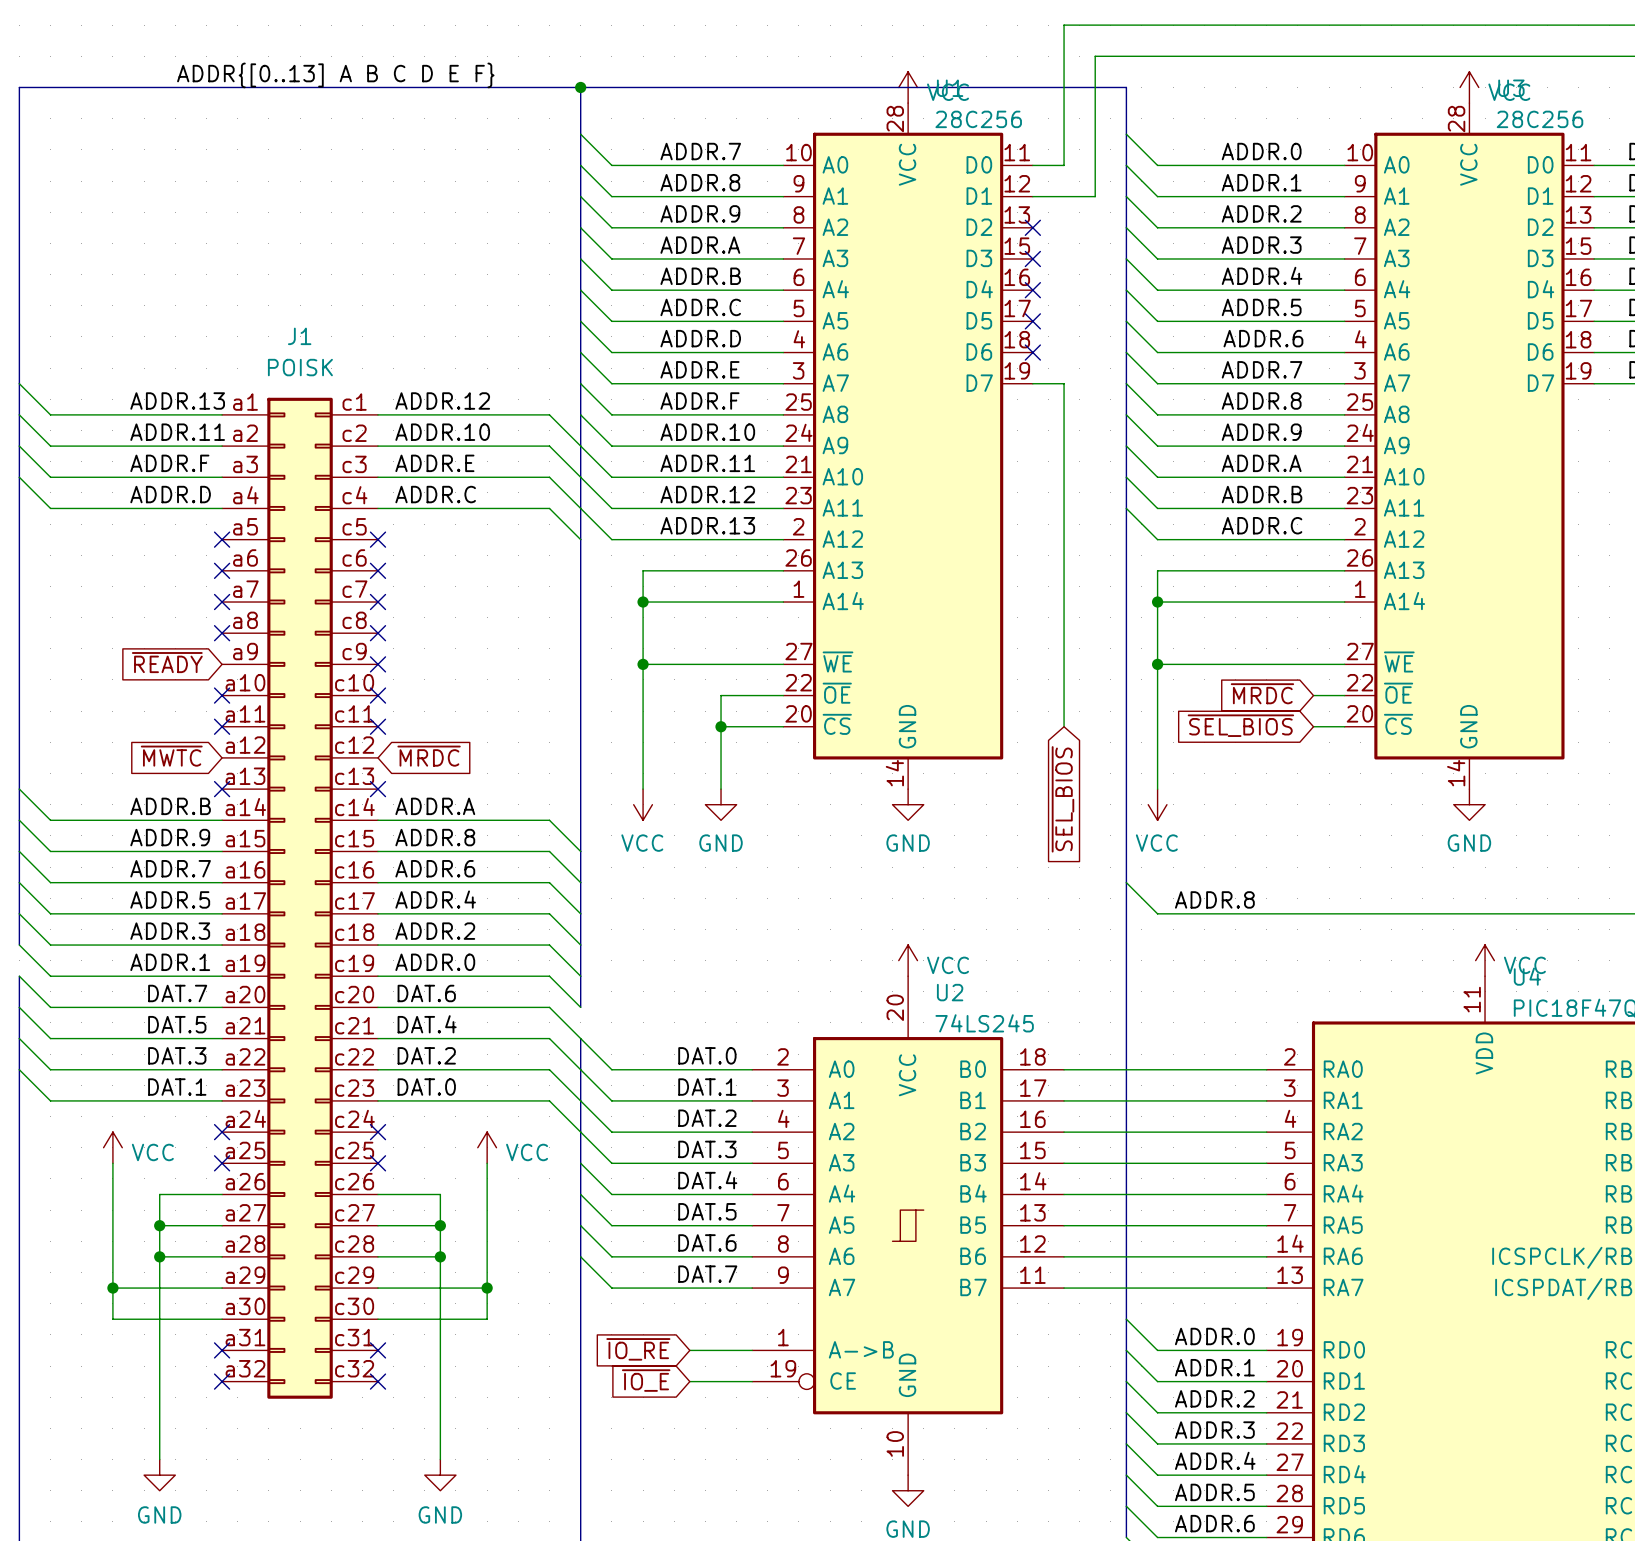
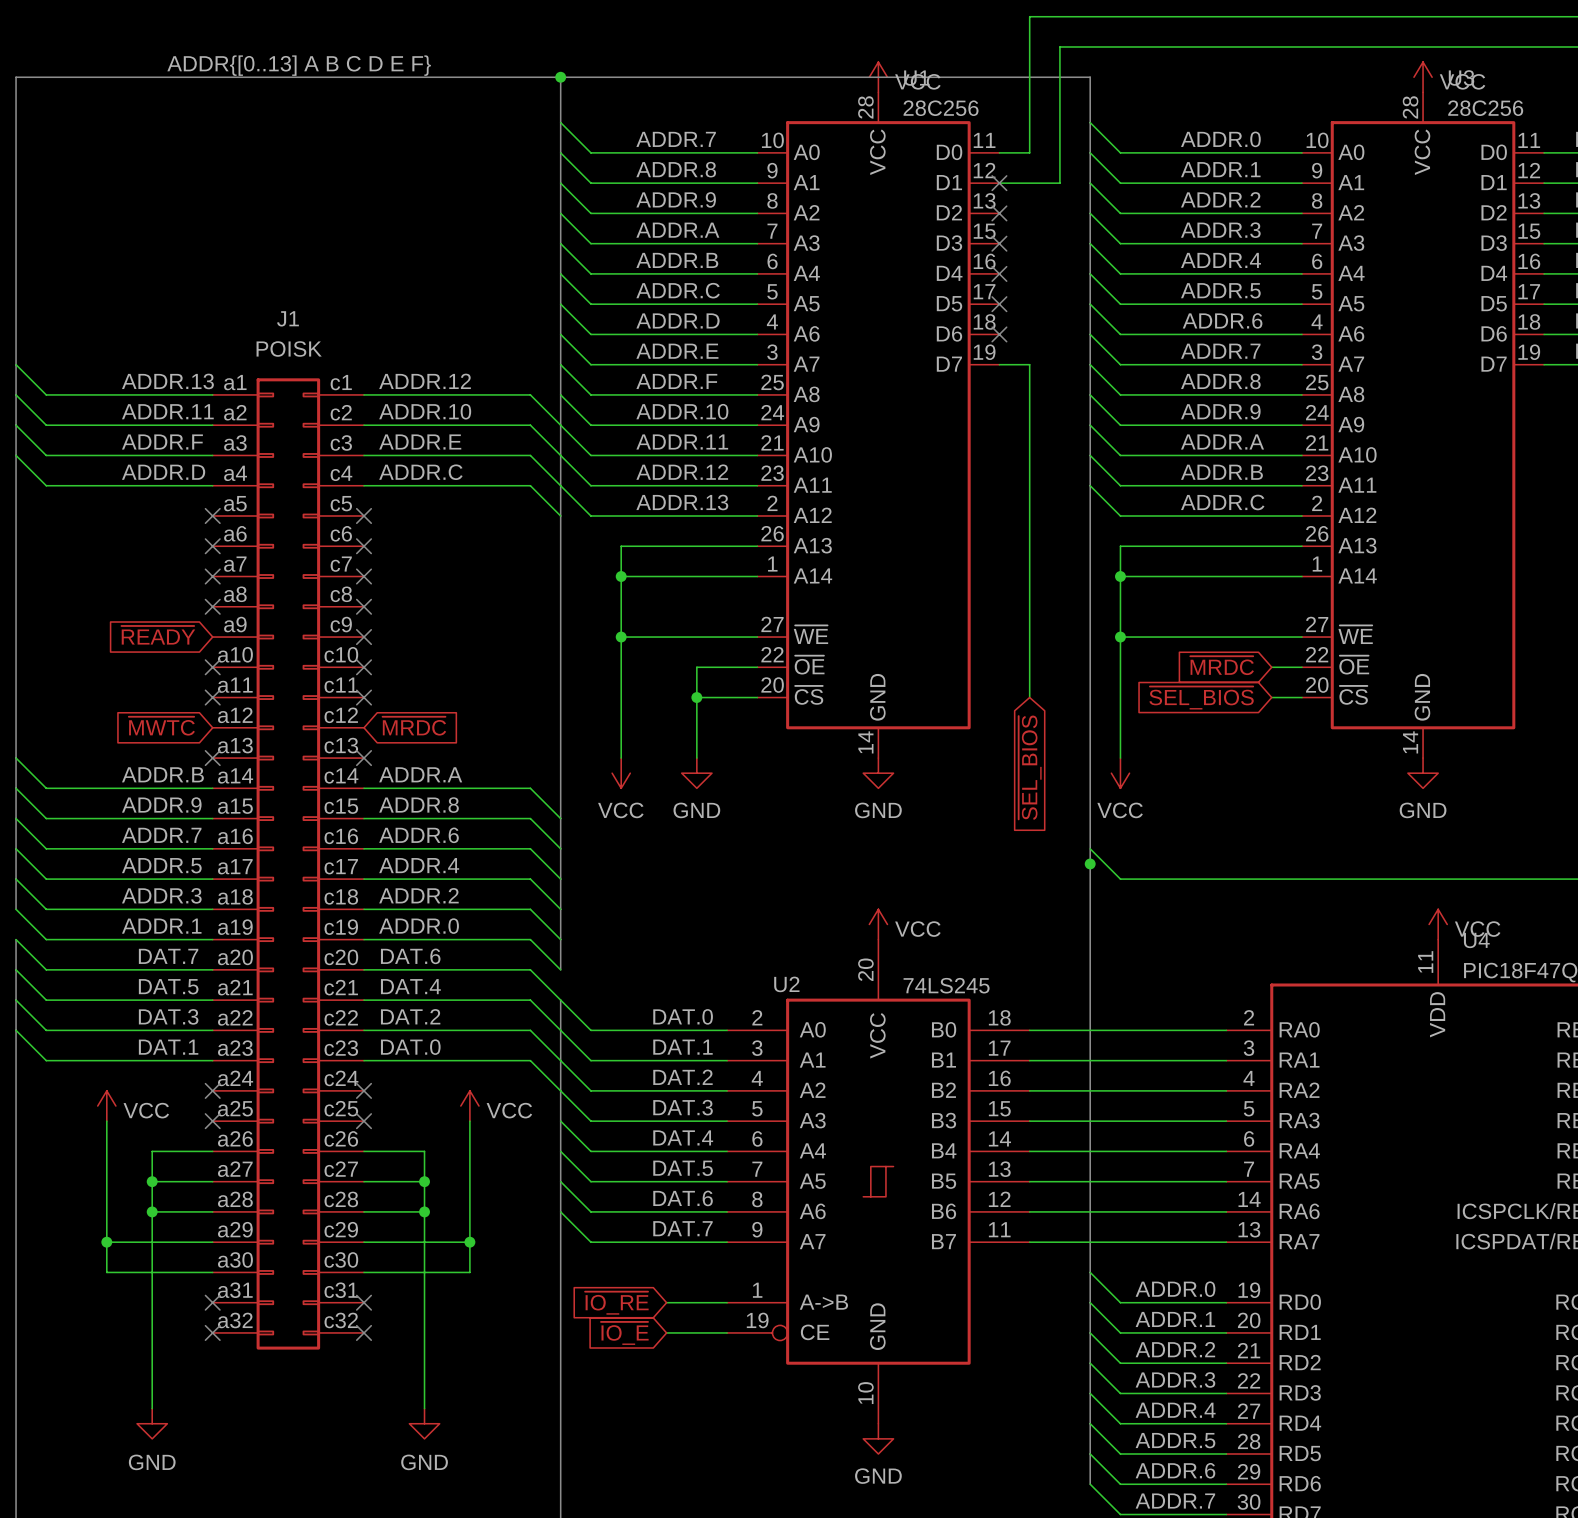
no-connect mark: none -> (999, 183)
junction: none -> (1090, 863)
label: ADDR.8 (1214, 899) -> none
U2 name position: U2 (950, 992) -> U2 (786, 984)

